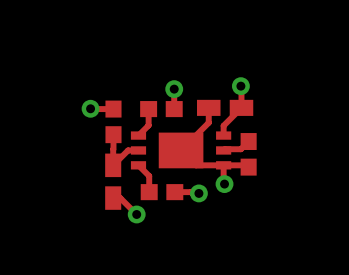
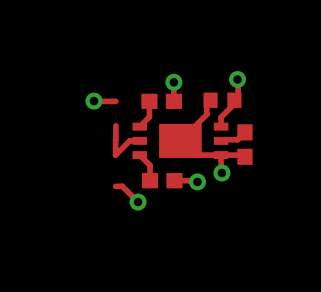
part footprint: [196, 99, 254, 116] -> [203, 92, 242, 108]
part: (113, 121) -> none
part: (113, 181) -> none

